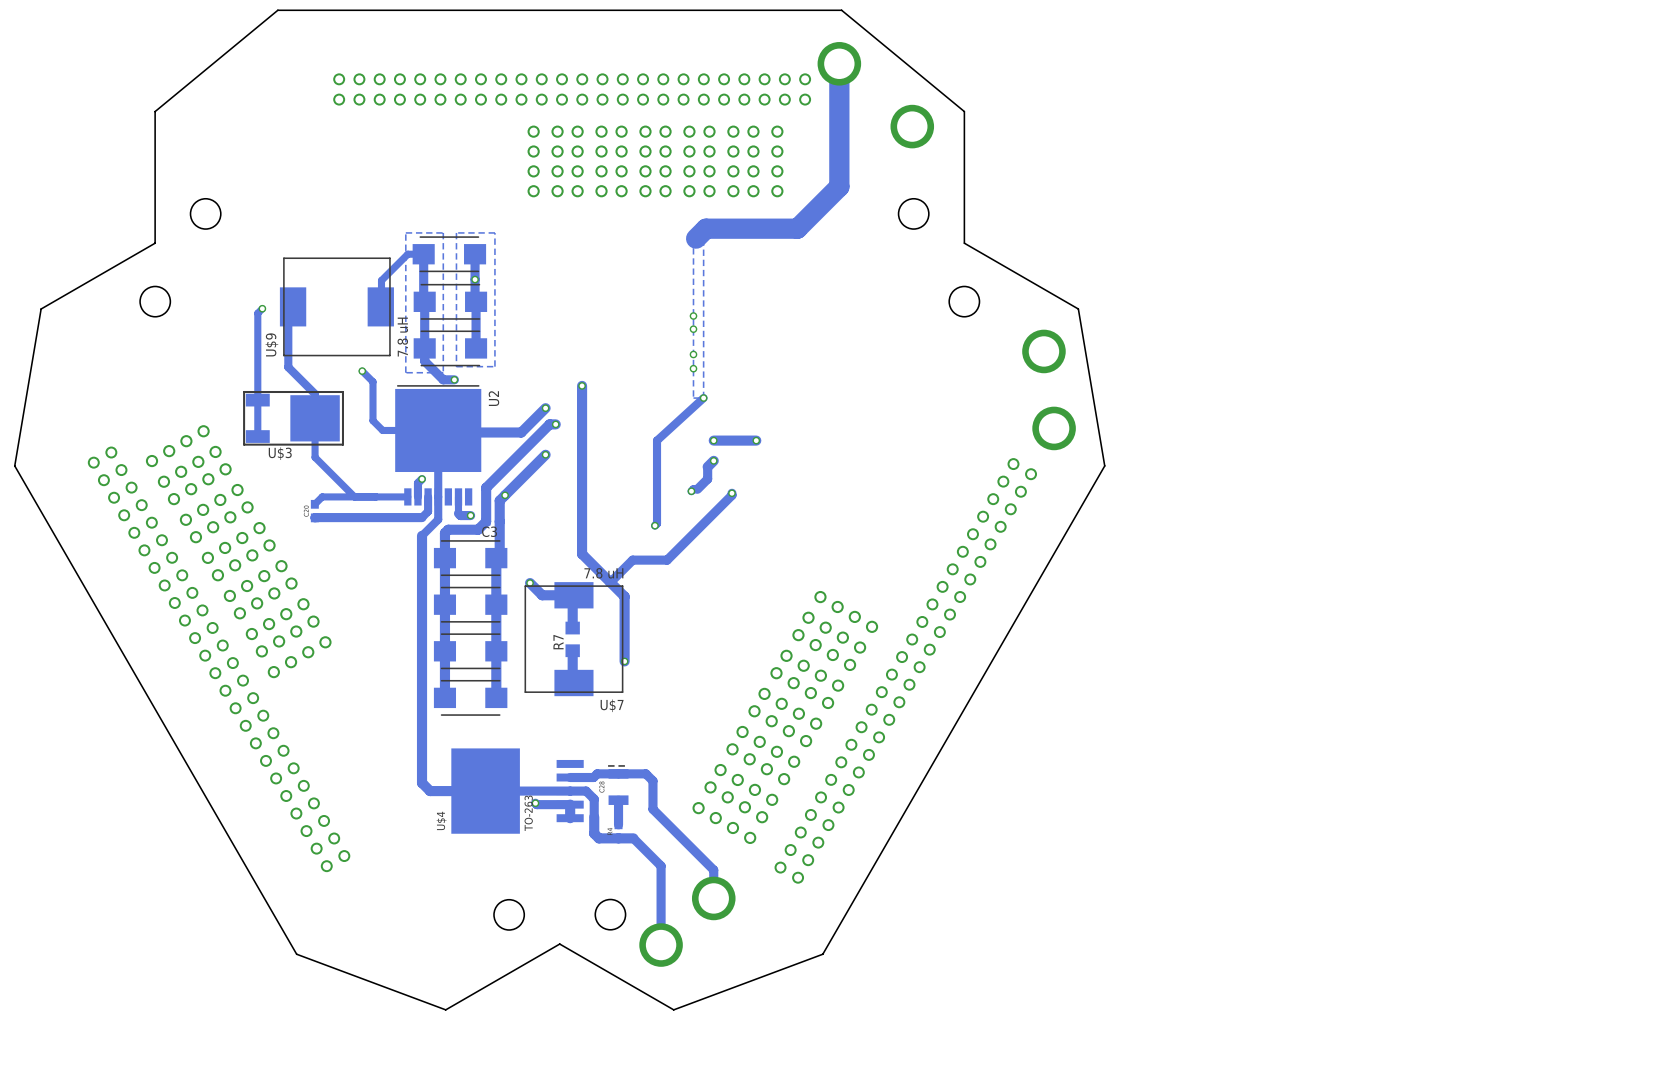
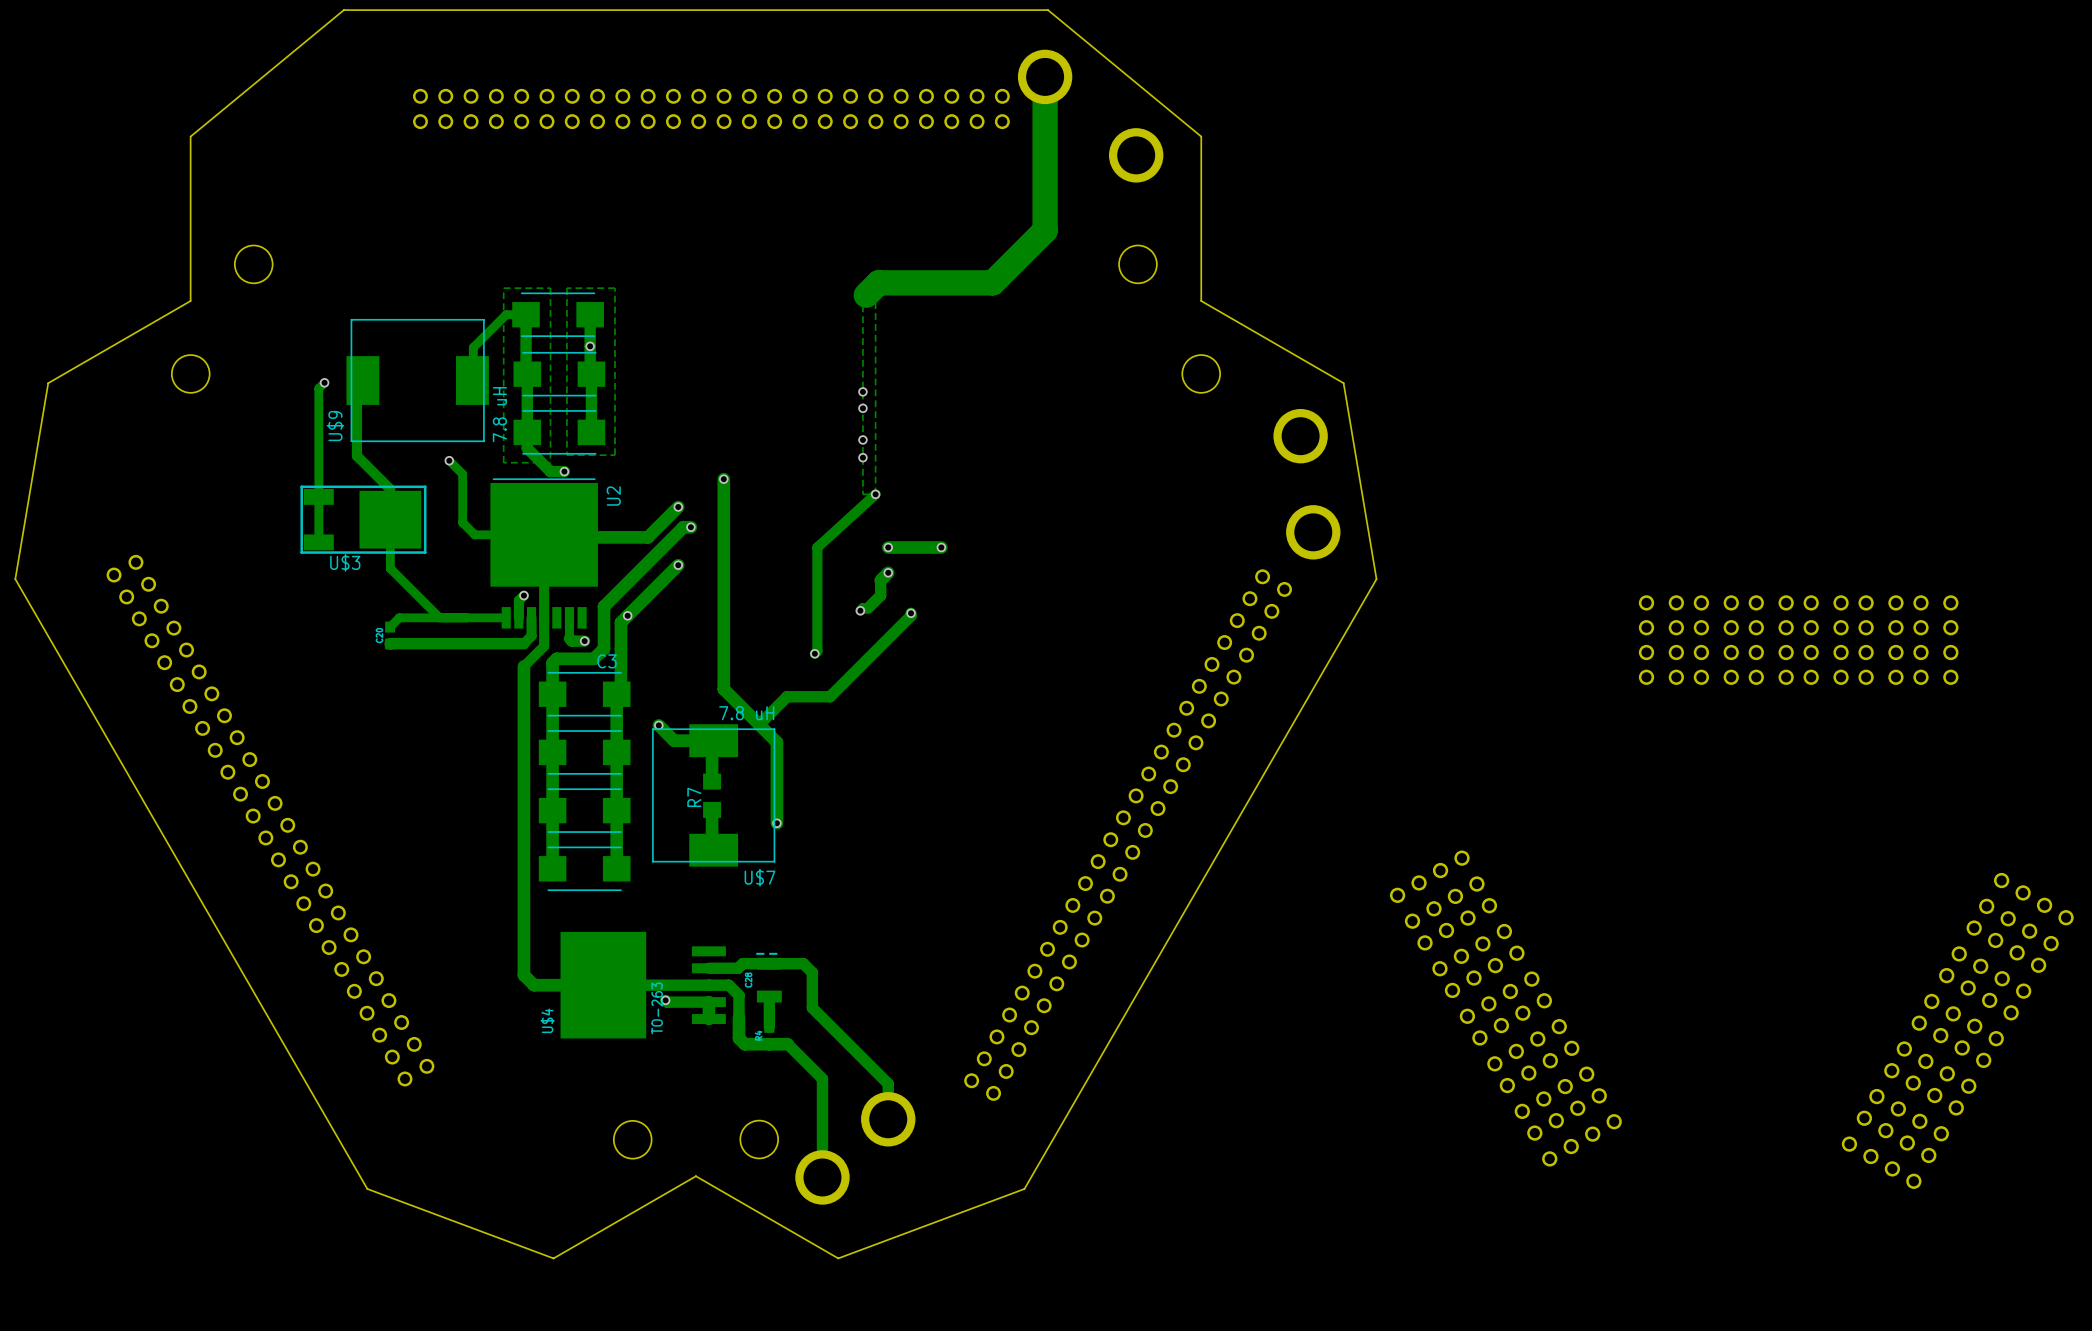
part: (655, 161) -> none
part: none -> (1798, 640)
part: (238, 551) -> none
part: (785, 717) -> none
part: none -> (1505, 1008)
part: none -> (1957, 1030)

